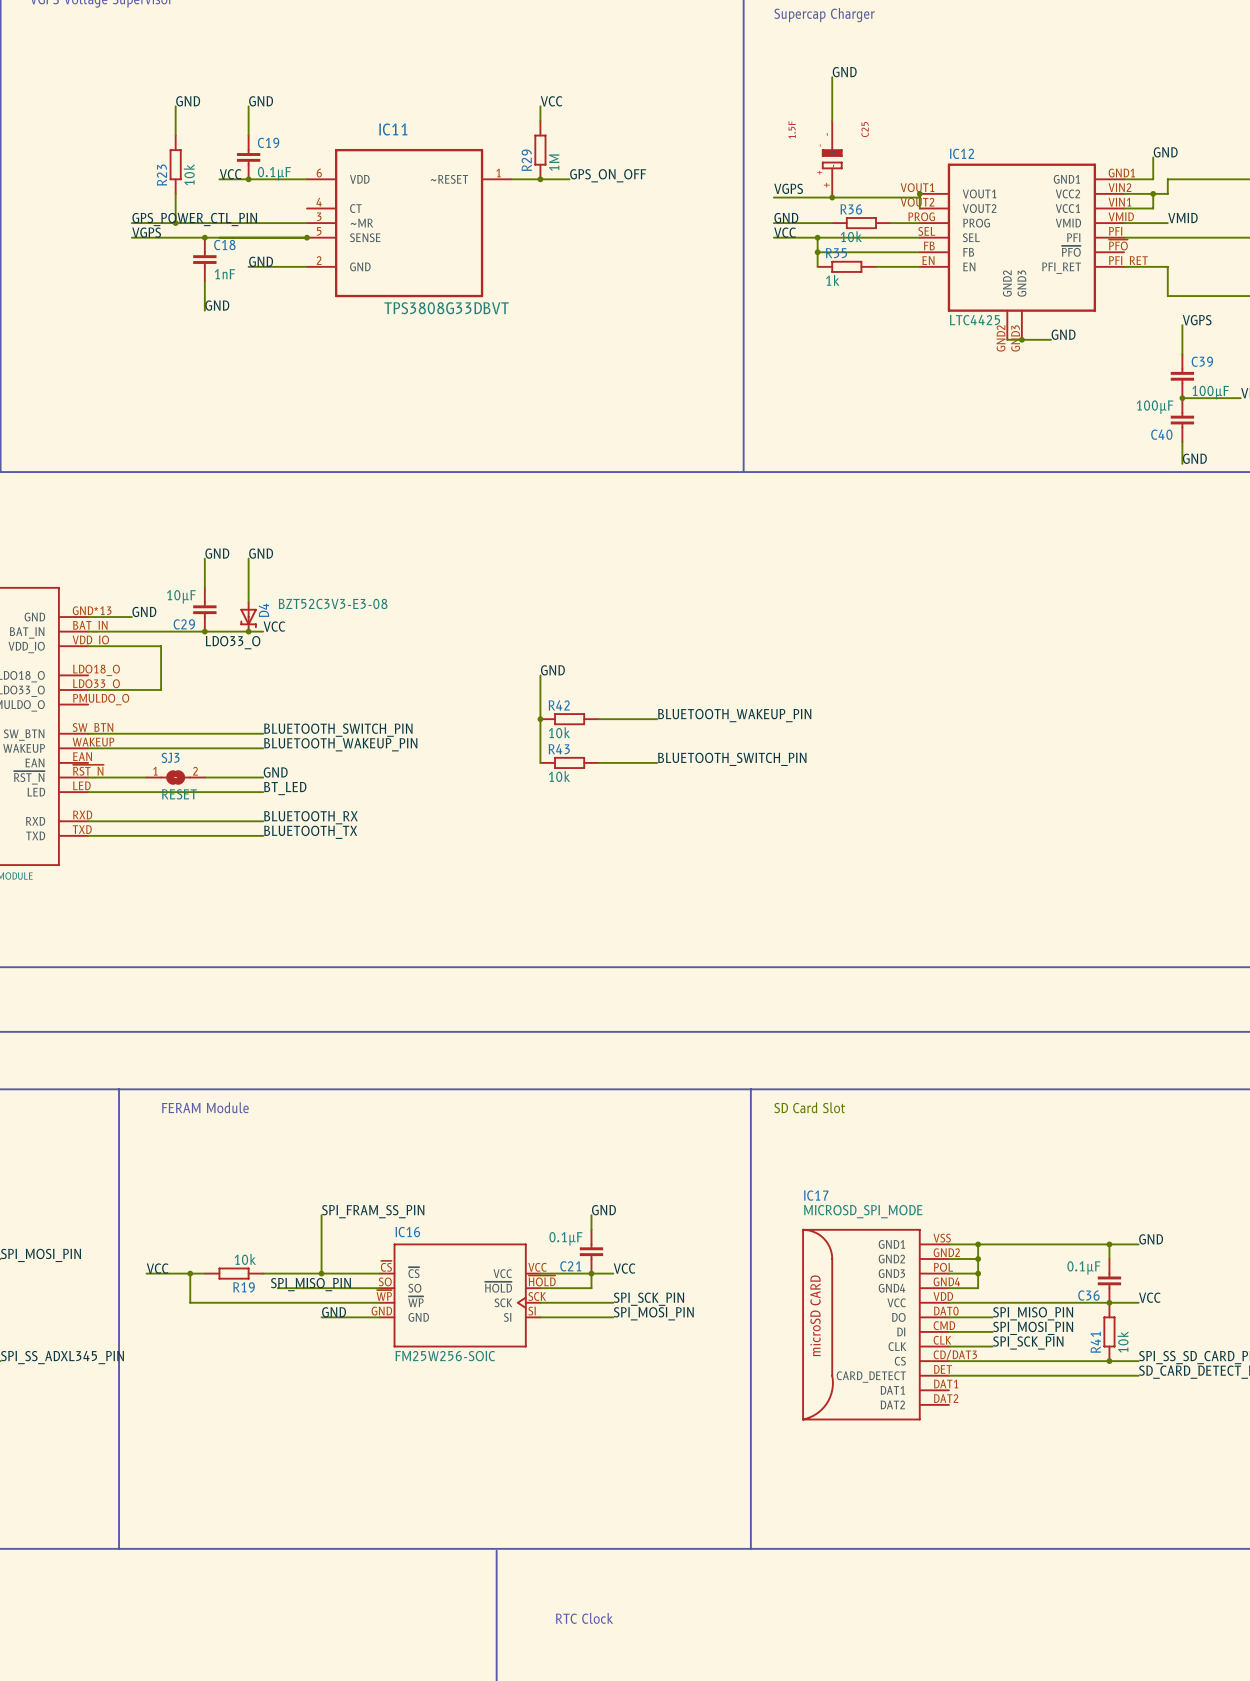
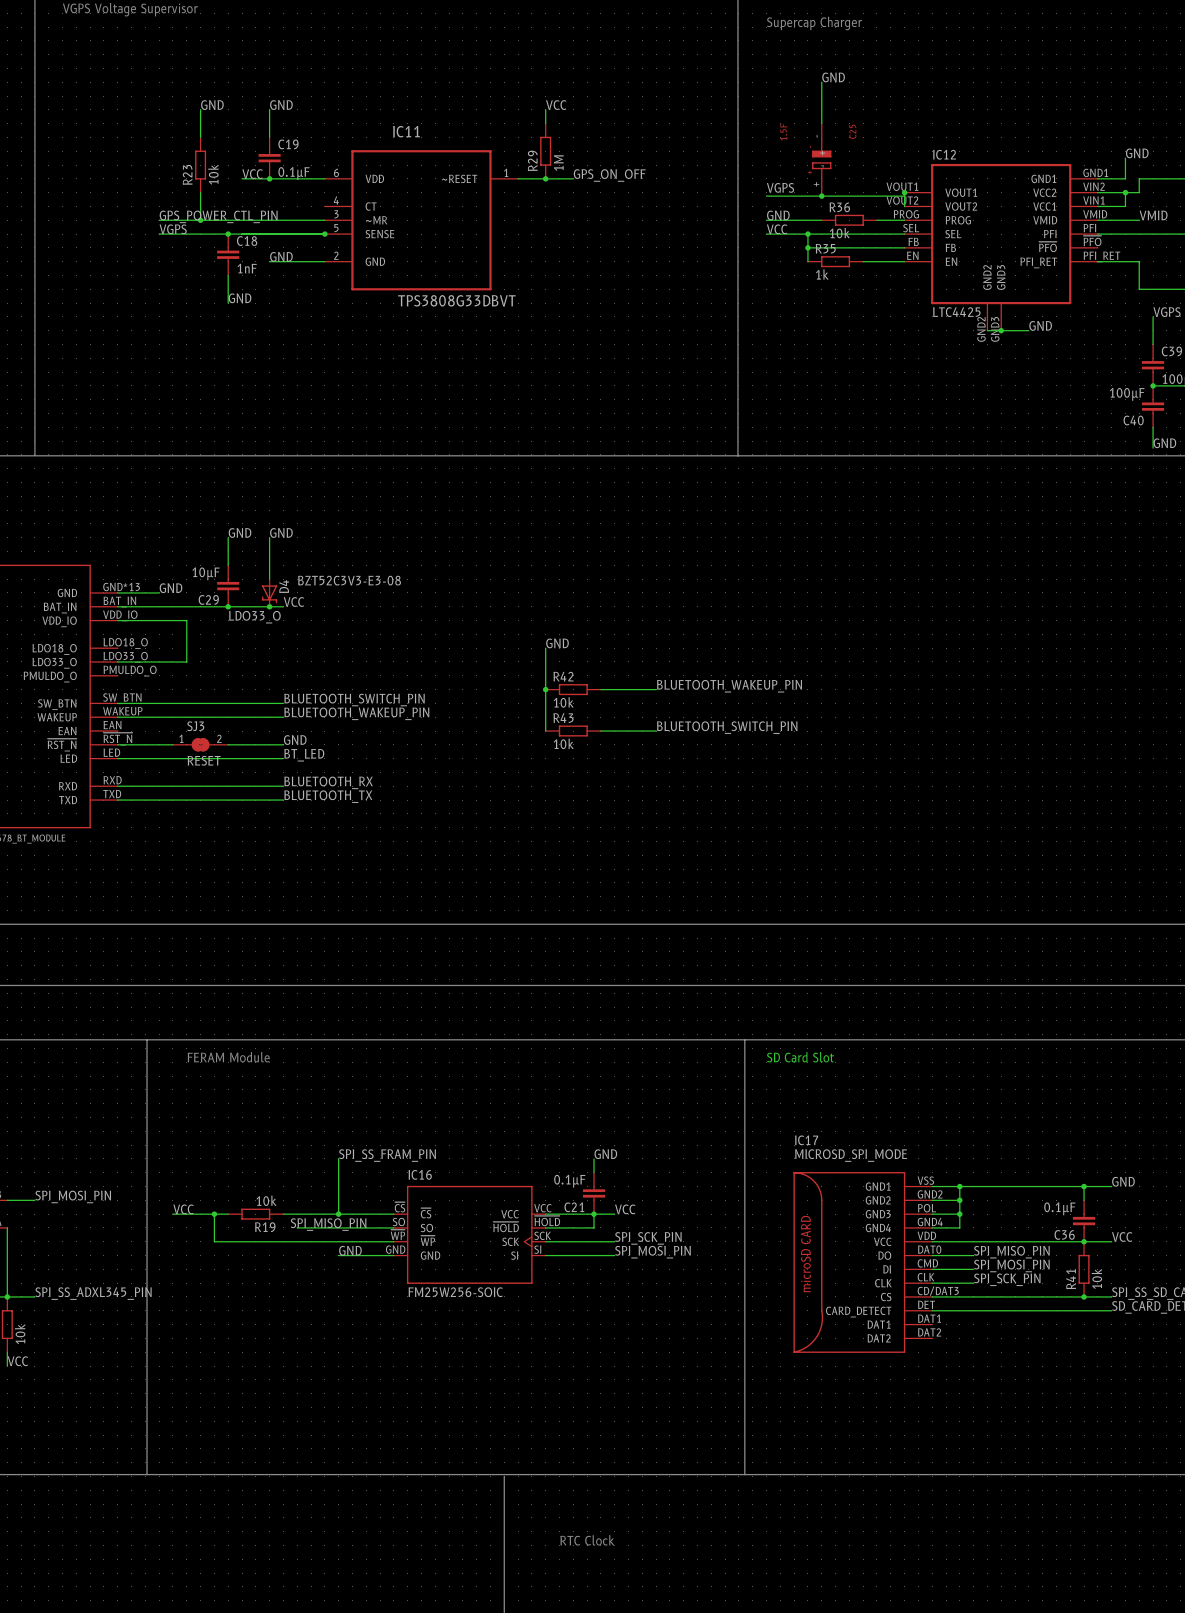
label: SPI_FRAM_SS_PIN (373, 1211) -> SPI_SS_FRAM_PIN (387, 1155)

